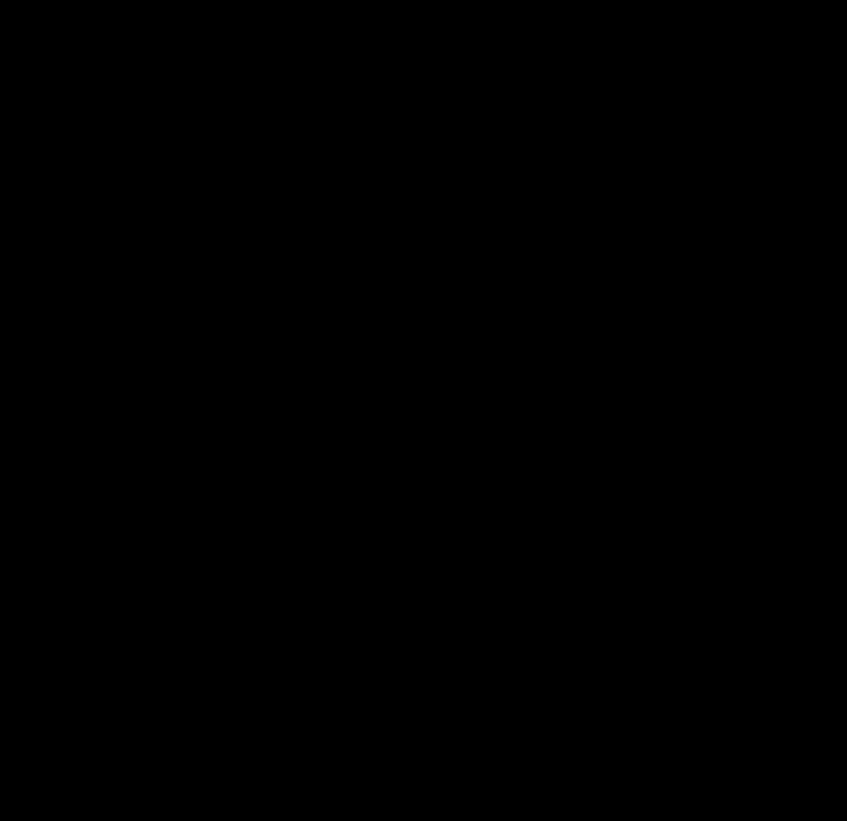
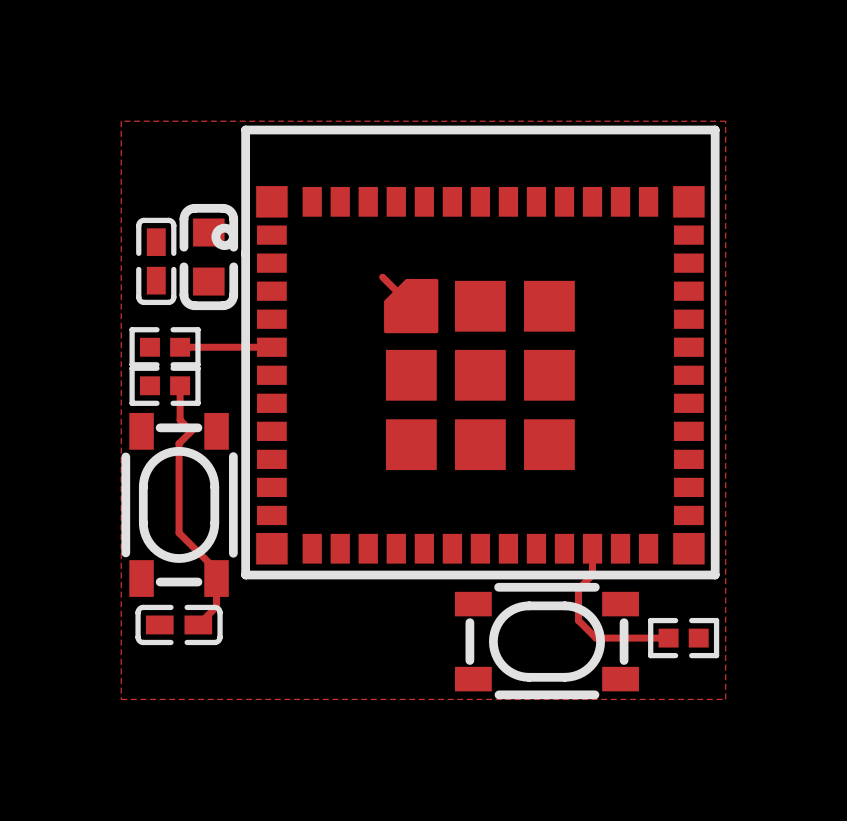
top zone outline: none -> (121, 121) (121, 699) (725, 699) (725, 121) (121, 121)
part: none -> (208, 257)
part: none -> (156, 261)
top track: none -> (382, 277) (411, 305)
part: none -> (165, 347)
top track: none -> (180, 347) (273, 347)
part: none -> (465, 352)
part: none -> (165, 385)
top track: none -> (180, 385) (180, 420) (191, 431) (179, 443) (179, 532) (216, 570) (216, 606) (198, 624)
part: none -> (179, 504)
top track: none -> (592, 546) (592, 575) (578, 589) (578, 620) (596, 638) (668, 638)
part: none -> (179, 624)
part: none -> (683, 638)
part: none -> (546, 641)

